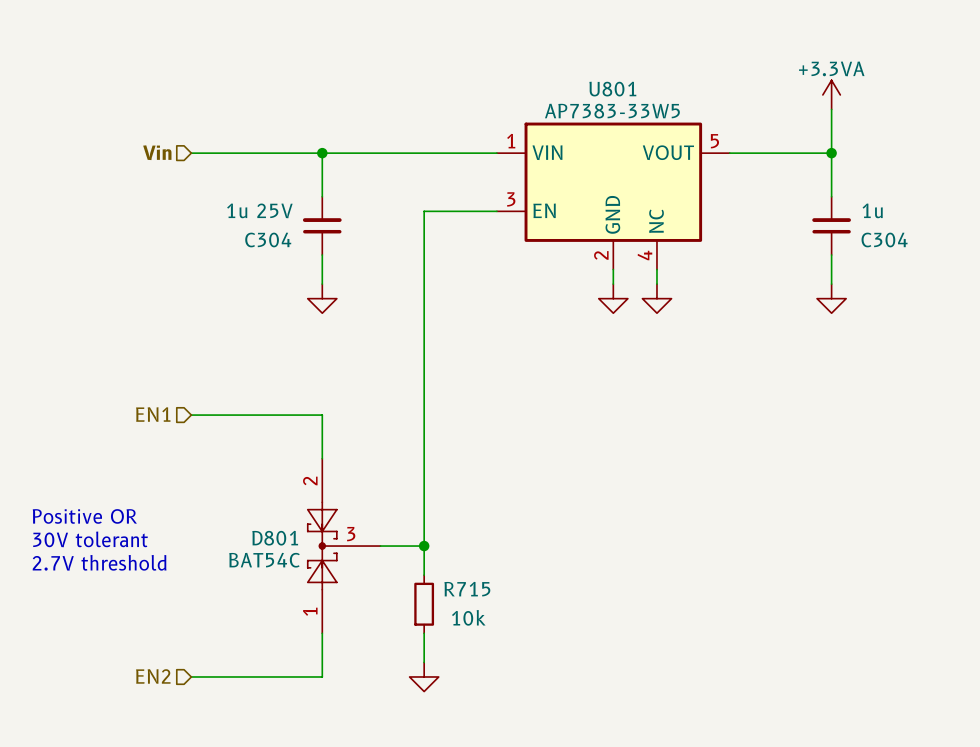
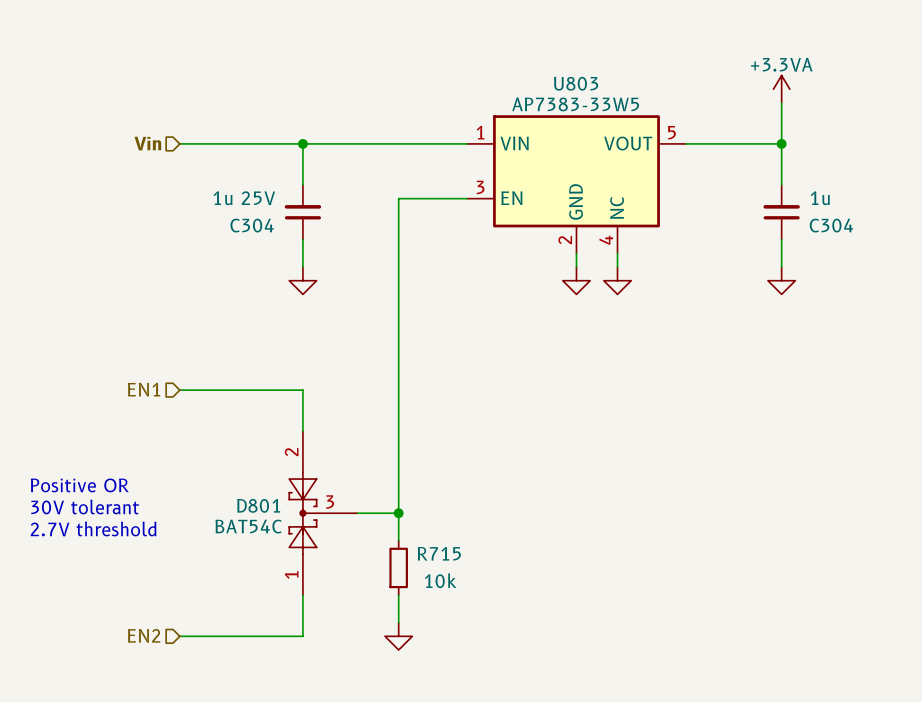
U801 name: U801 (612, 89) -> U803 (576, 83)

